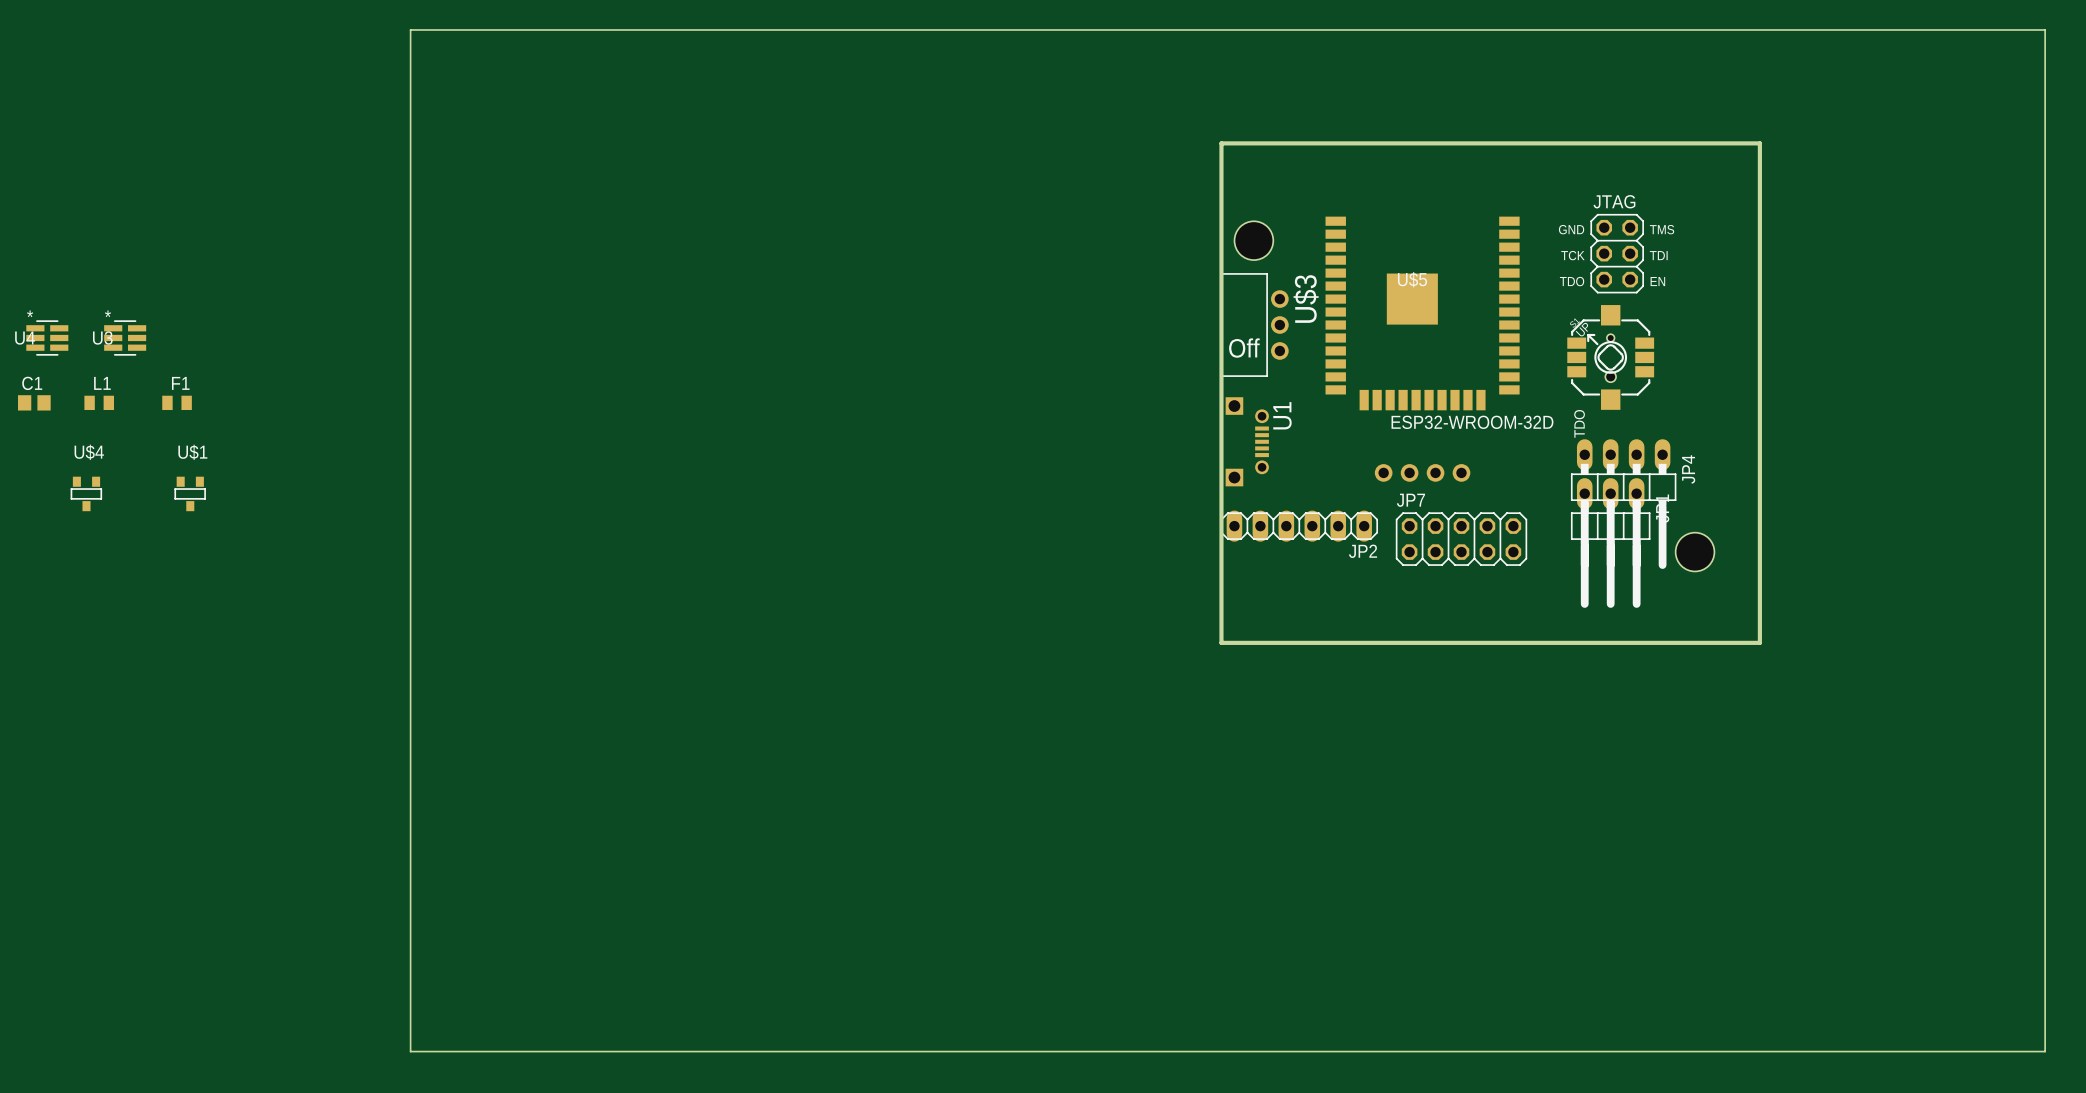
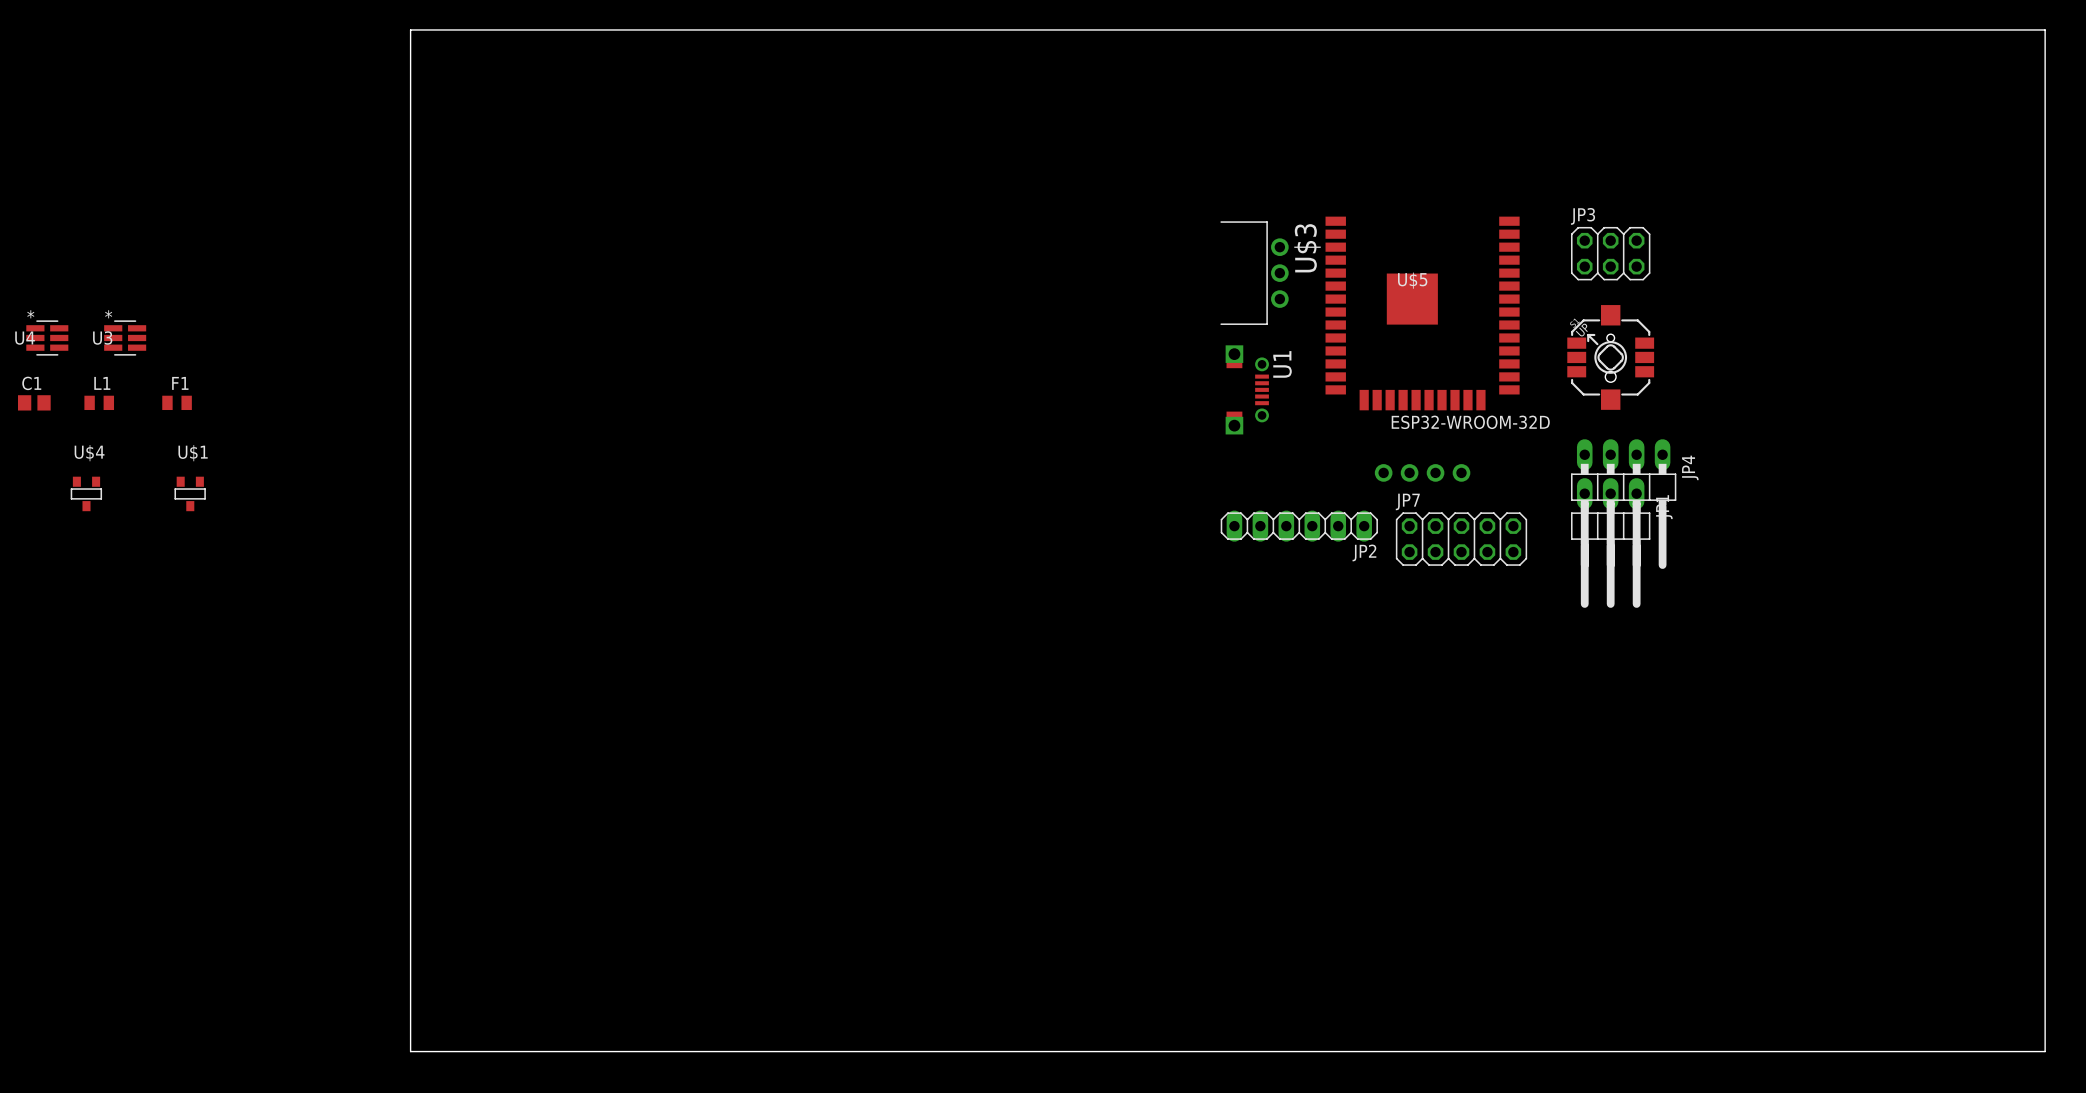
board edge: (1221, 143) (1221, 642) (1759, 642) (1759, 143) (1221, 143) -> none
text: GND (1571, 229) -> none
text: TMS (1662, 229) -> none
hole: (1253, 240) -> none
JP3: none -> (1610, 253)
part: JTAG (1617, 253) -> none
text: TCK (1572, 255) -> none
text: TDI (1658, 255) -> none
text: TDO (1572, 281) -> none
text: EN (1657, 281) -> none
U$3 position: (1254, 325) -> (1254, 273)
text: Off (1244, 348) -> none
U1 footprint: [1225, 397, 1269, 487] -> [1225, 345, 1269, 435]
text: TDO (1579, 423) -> none
hole: (1695, 552) -> none

